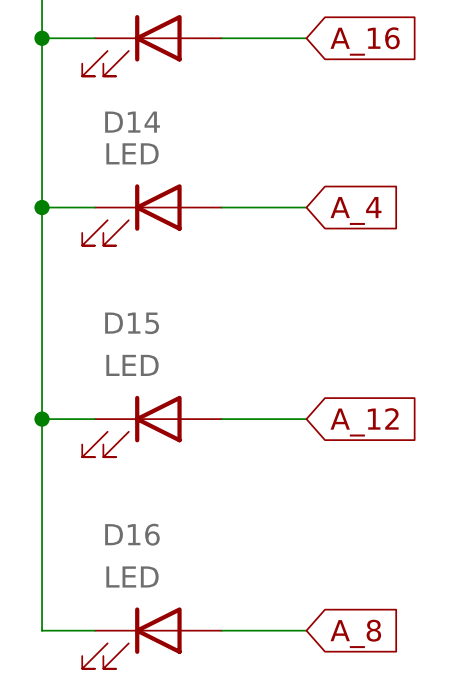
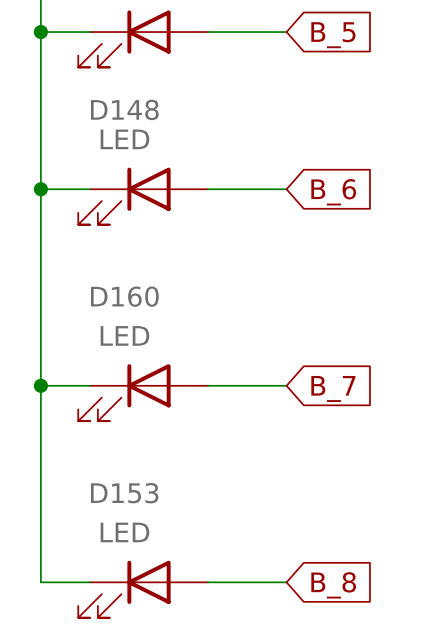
global label: A_16 (365, 41) -> B_5 (333, 35)
D14 name: D14 (132, 122) -> D148 (124, 109)
global label: A_4 (355, 210) -> B_6 (333, 192)
D15 name: D15 (132, 323) -> D160 (124, 296)
global label: A_12 (364, 422) -> B_7 (333, 388)
D16 name: D16 (132, 534) -> D153 (124, 493)
global label: A_8 (355, 633) -> B_8 (333, 585)

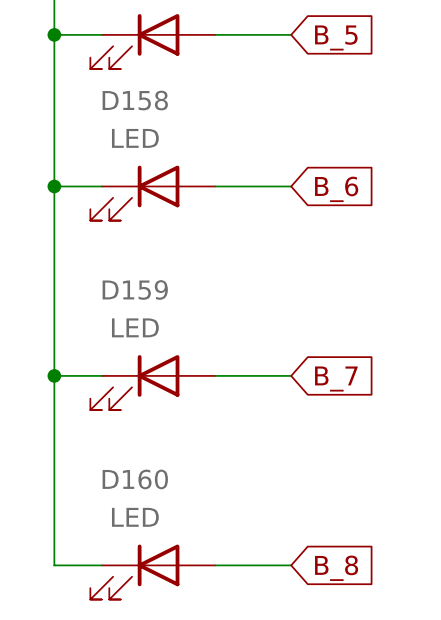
D148 name: D148 (124, 109) -> D158 (135, 100)
D160 name: D160 (124, 296) -> D159 (135, 289)
D153 name: D153 (124, 493) -> D160 (135, 479)

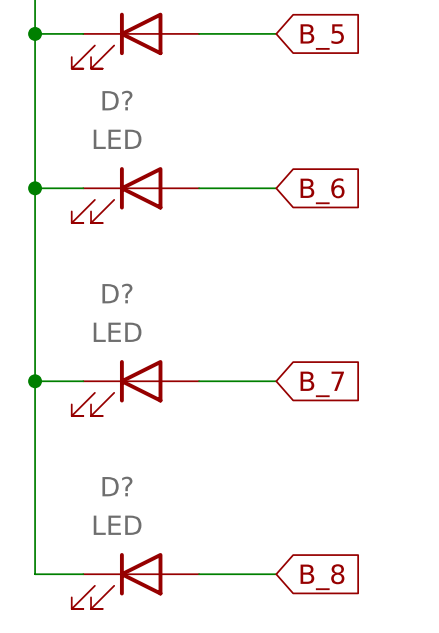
D158 name: D158 (135, 100) -> D? (117, 100)
D159 name: D159 (135, 289) -> D? (117, 293)
D160 name: D160 (135, 479) -> D? (117, 486)

